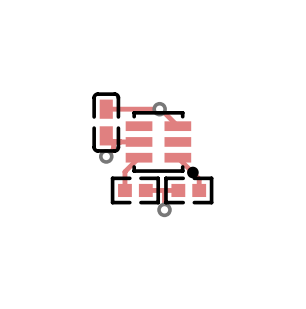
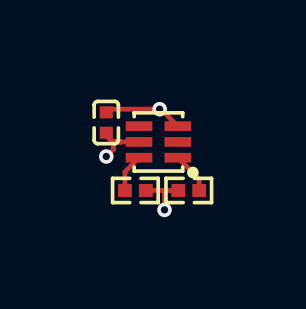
part footprint: [92, 92, 121, 153] -> [92, 99, 121, 146]

